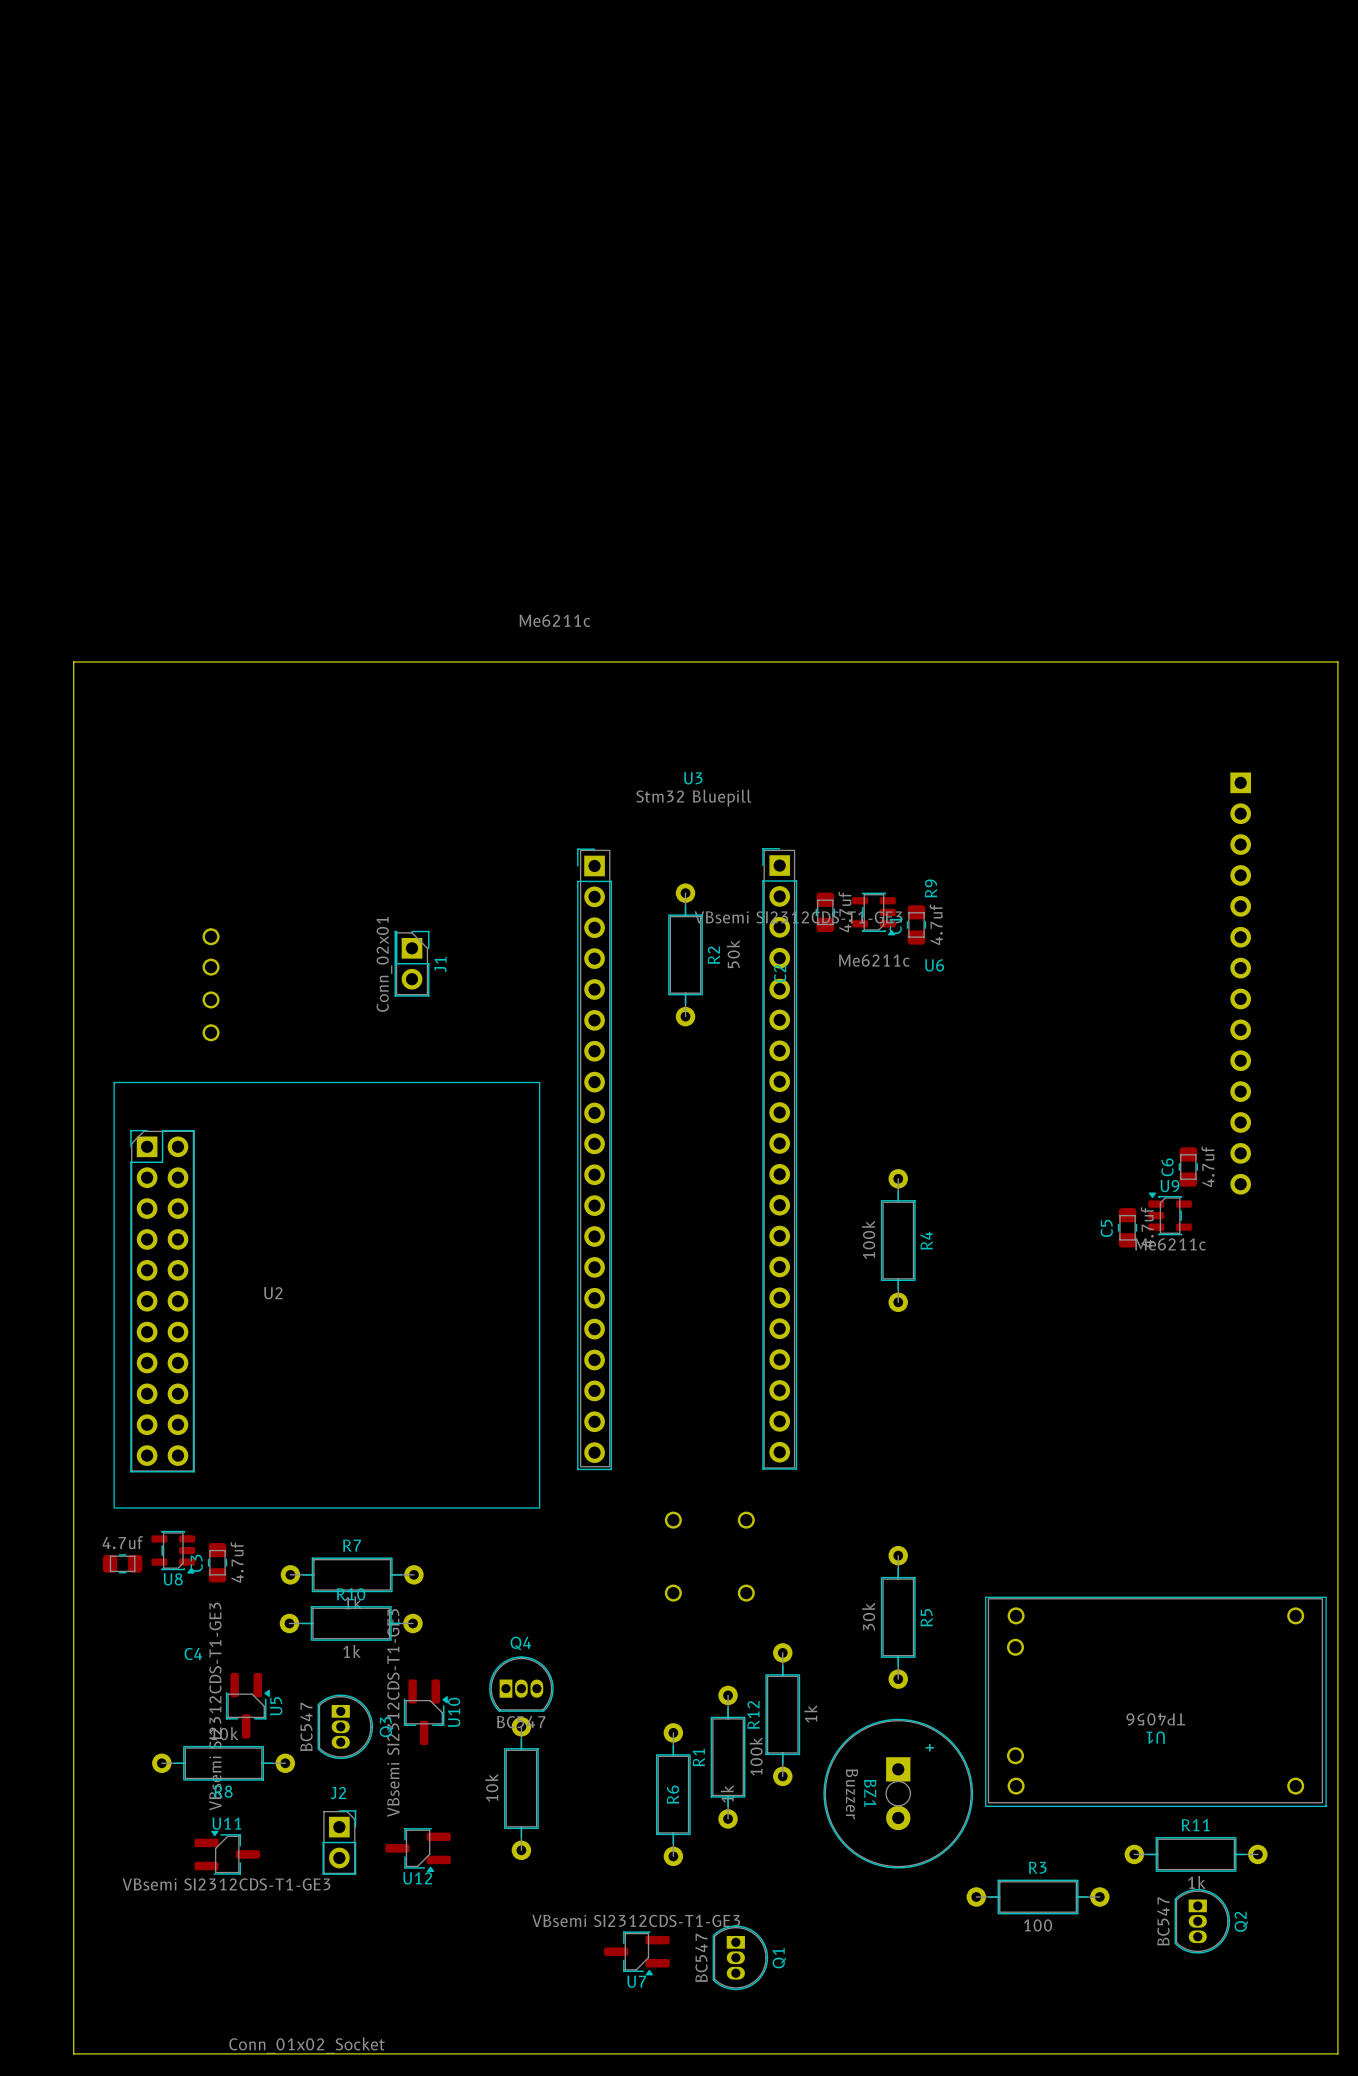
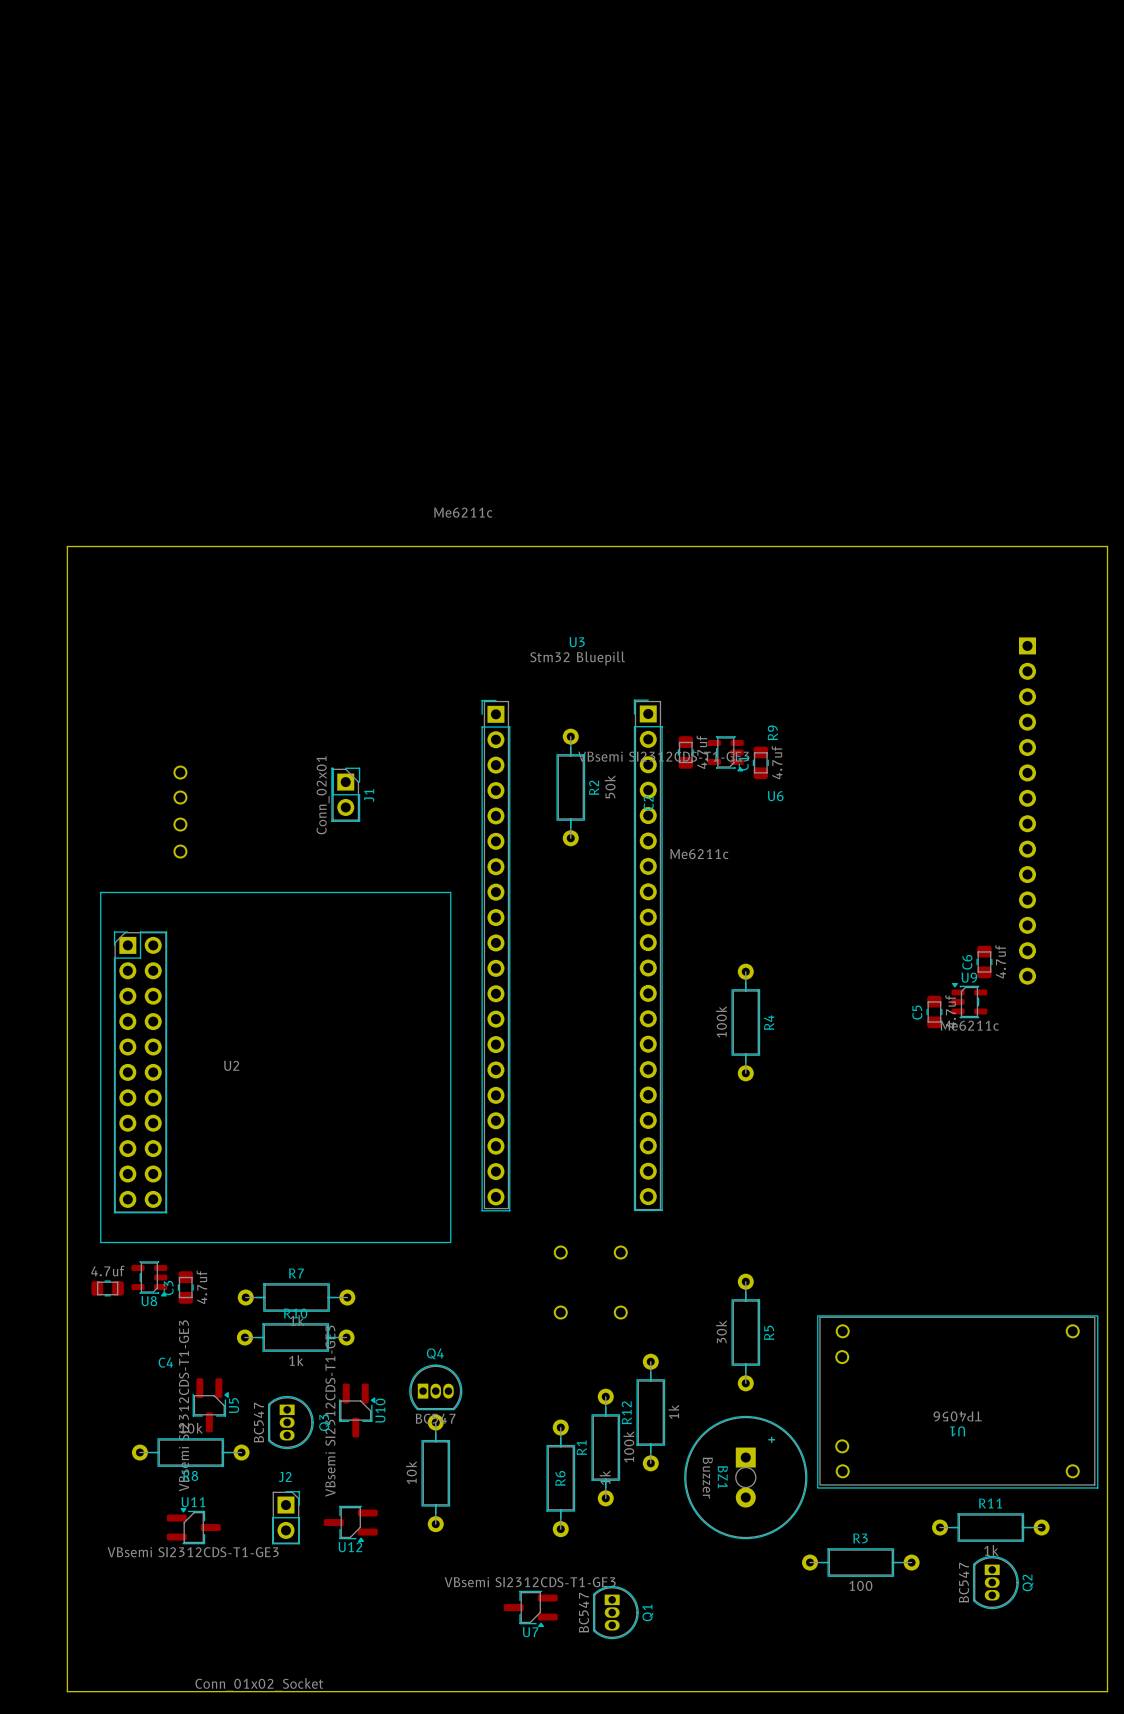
U6 value position: Me6211c (874, 960) -> Me6211c (699, 854)

